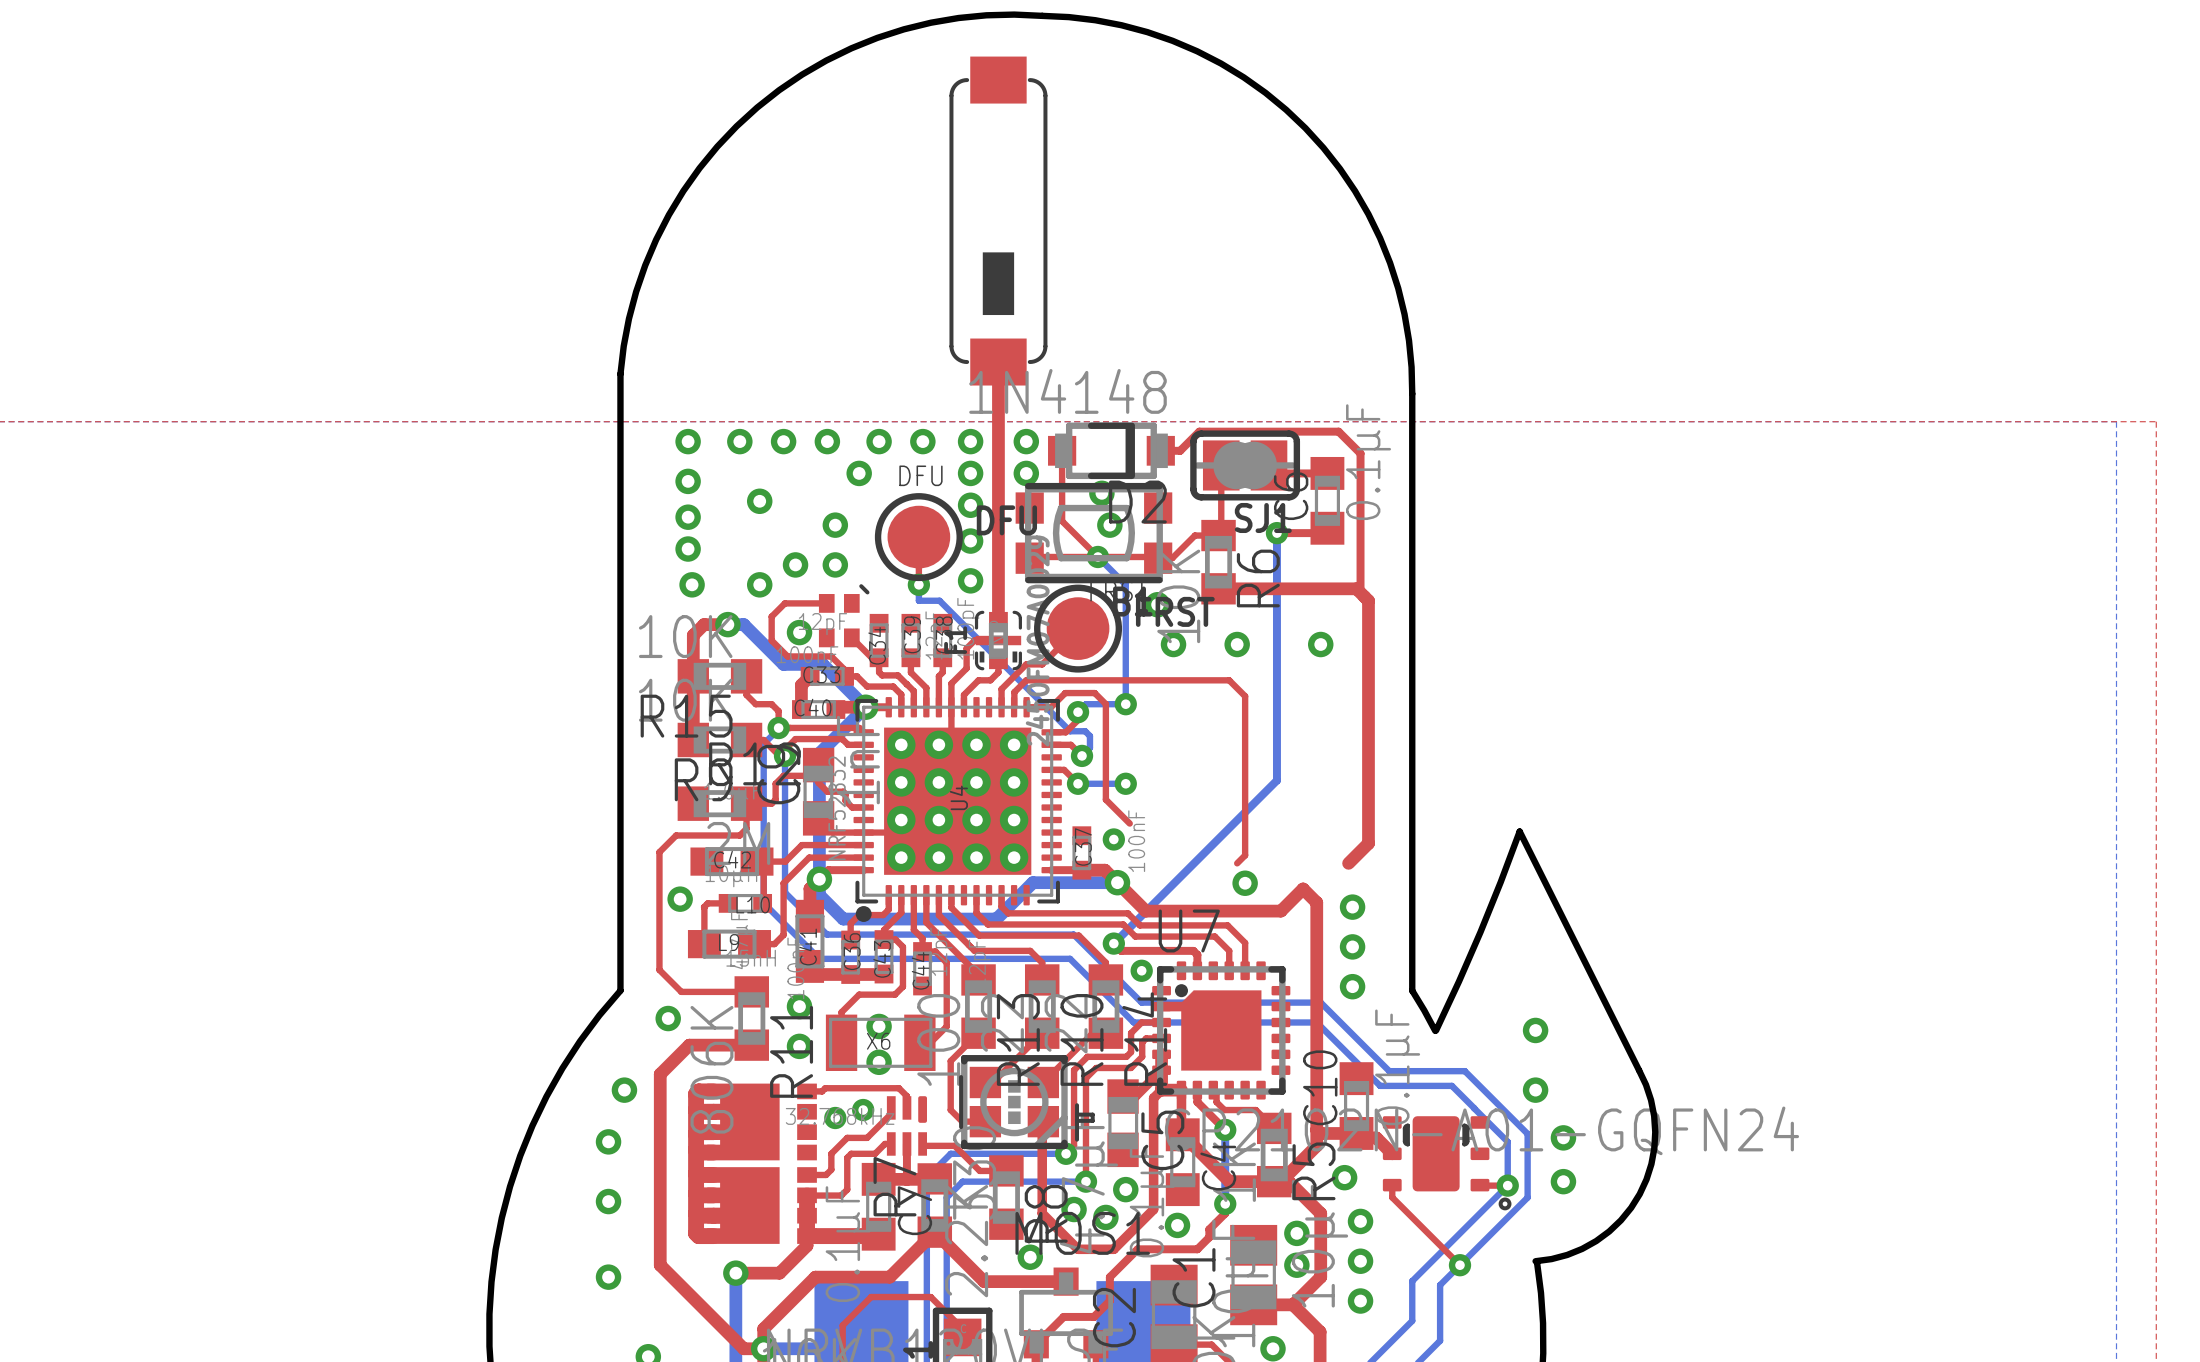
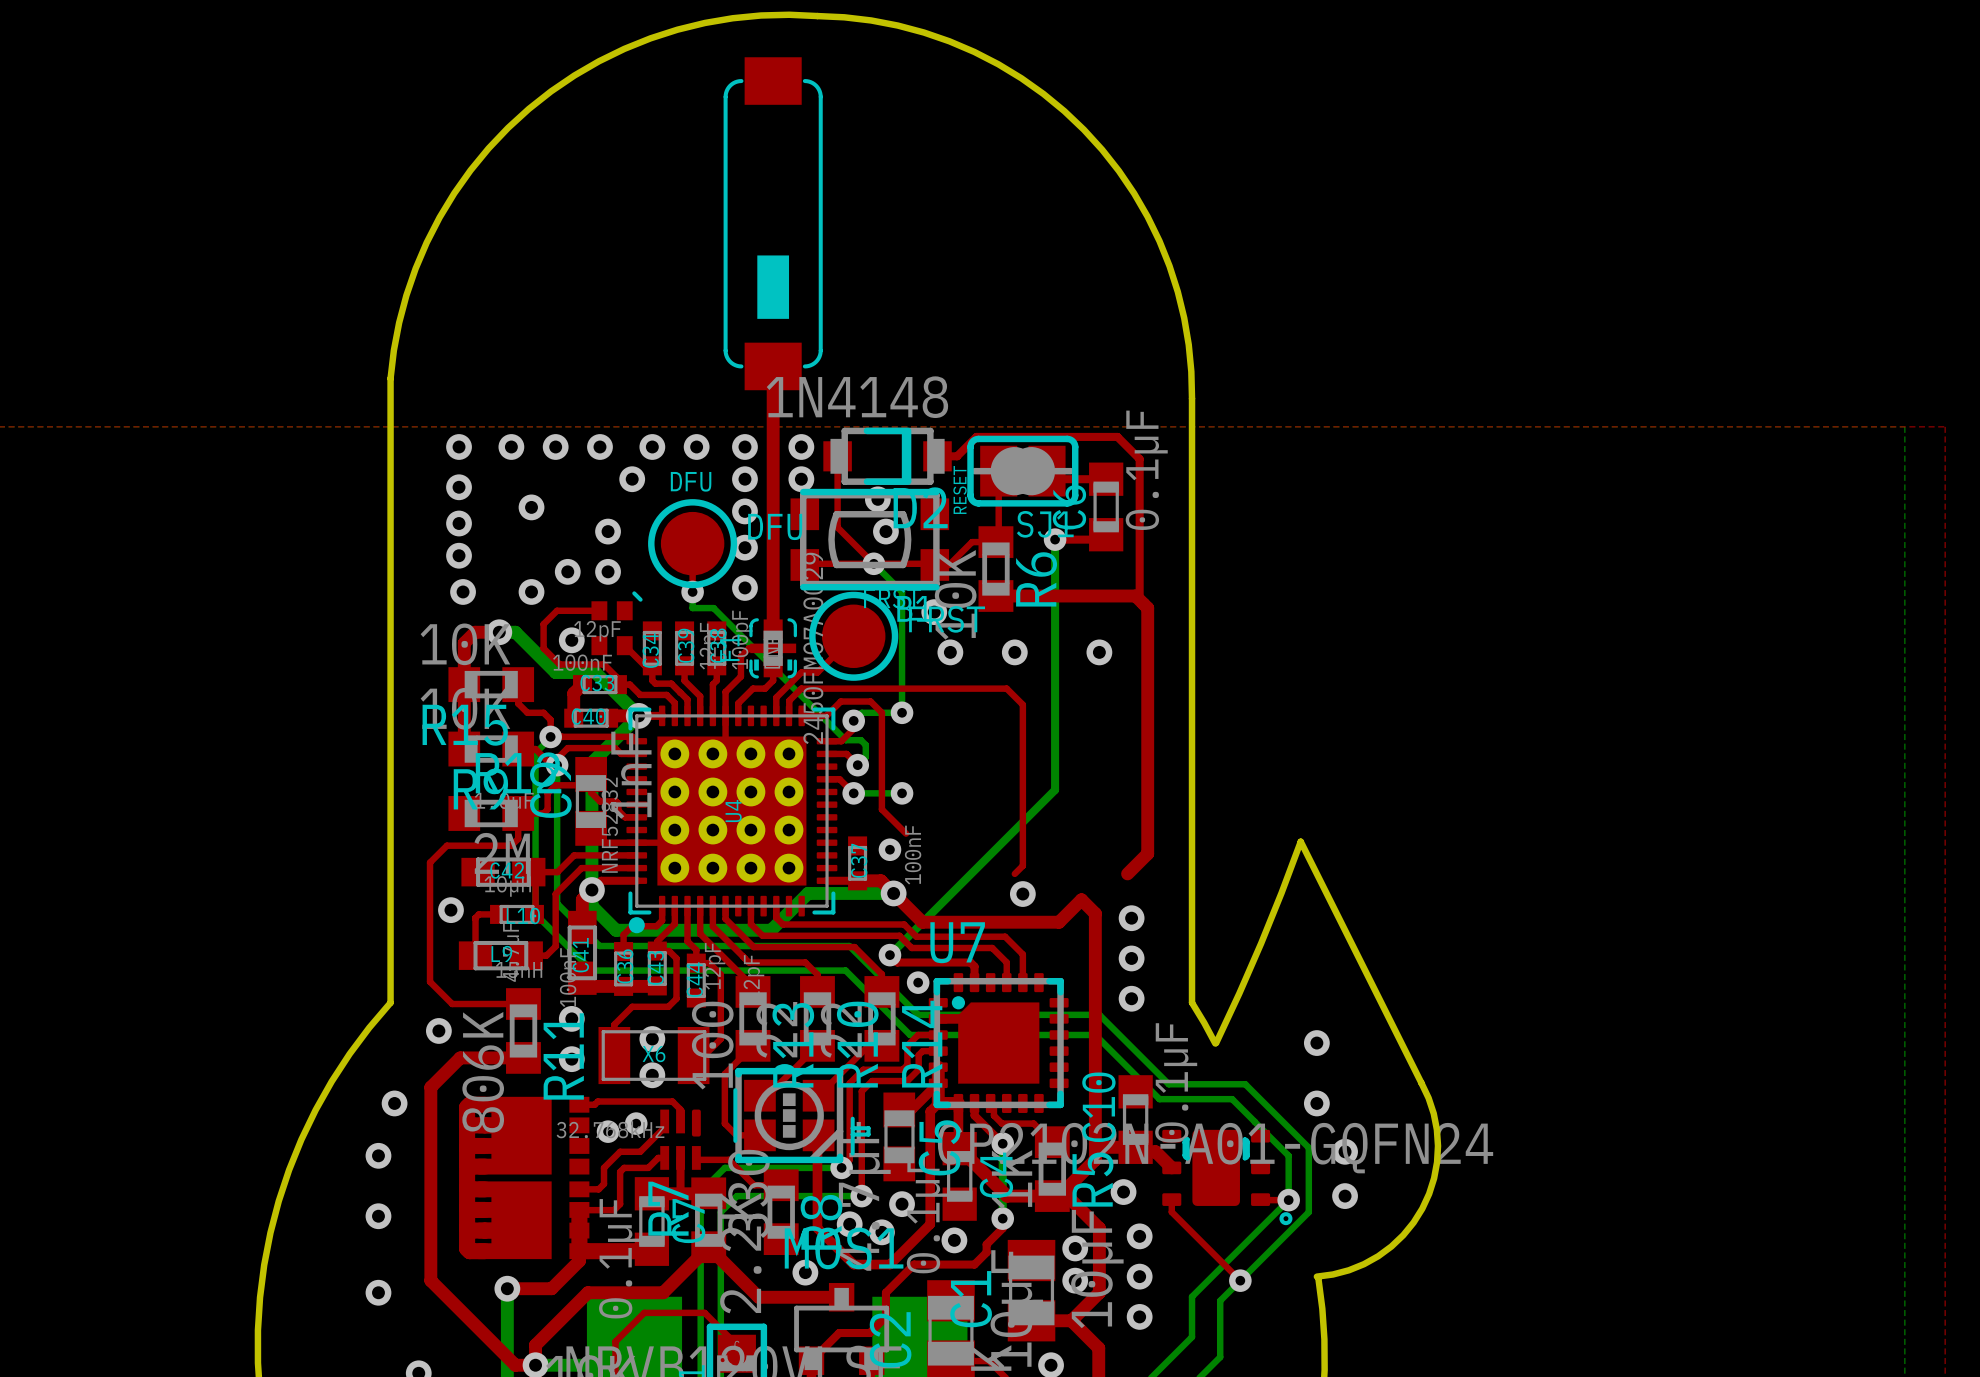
text: none -> RESET (960, 489)

